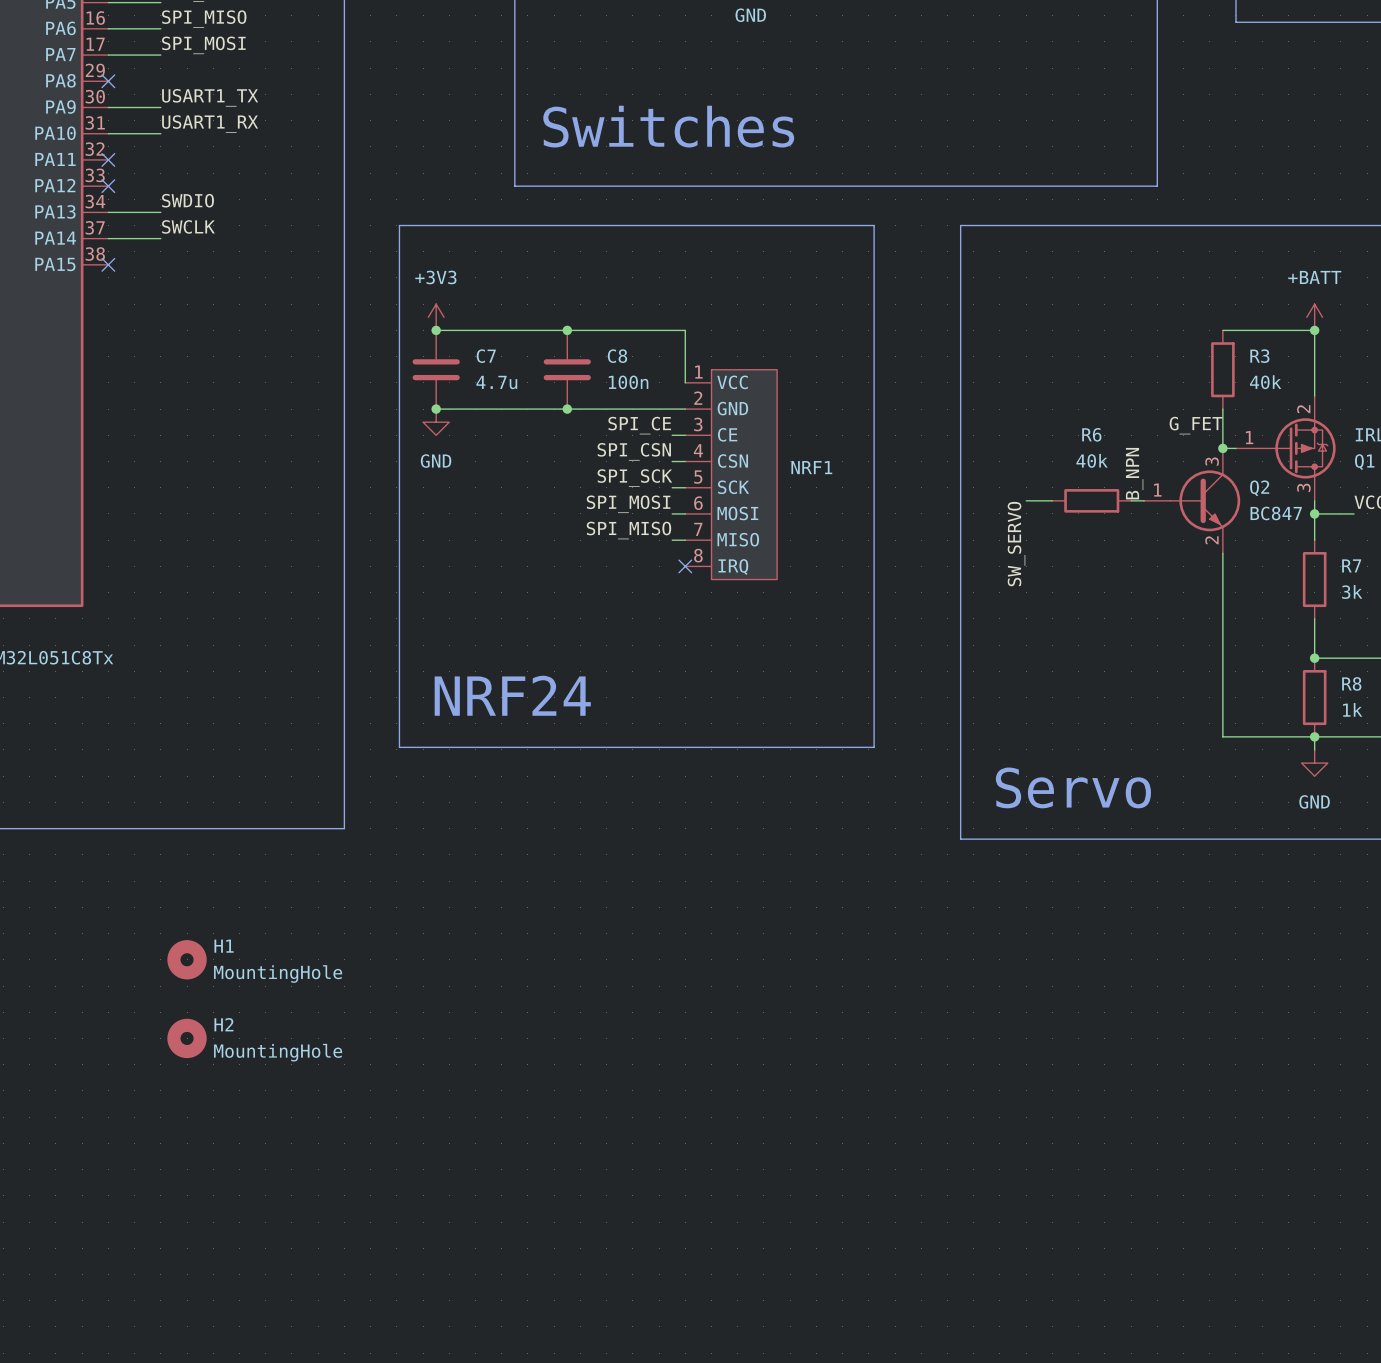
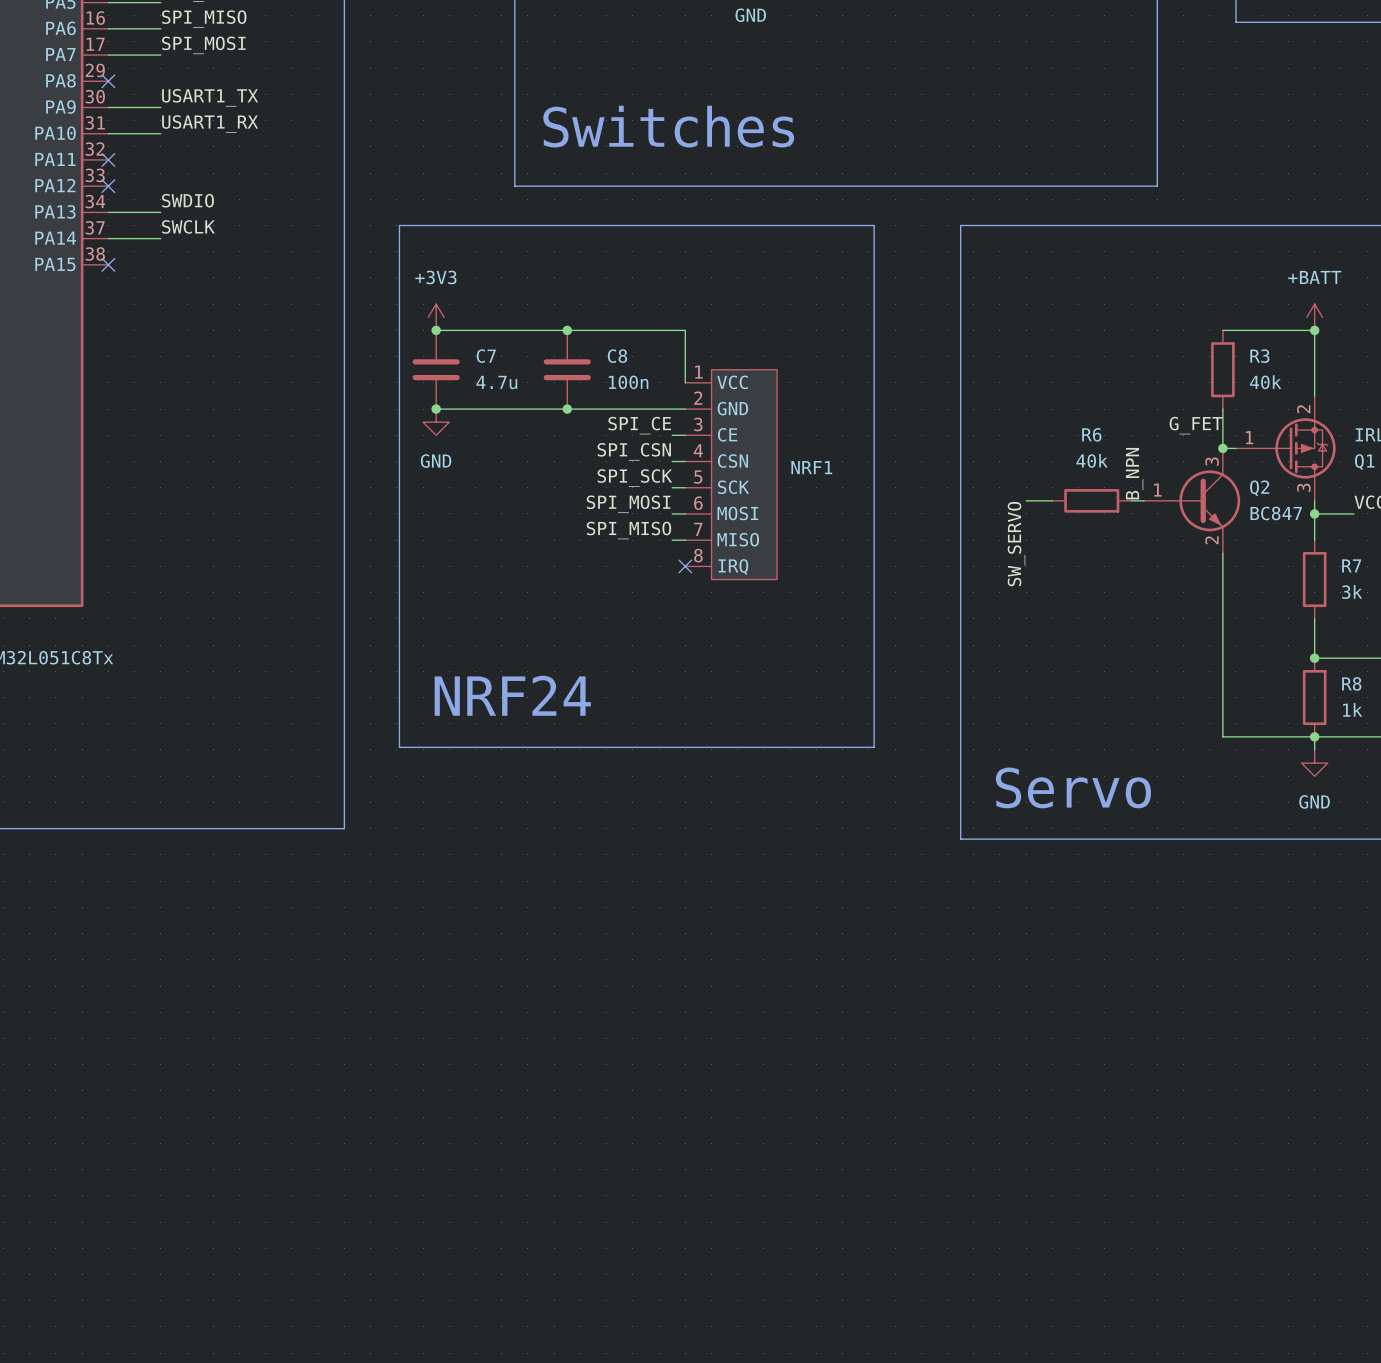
H1: MountingHole (187, 959) -> none
H2: MountingHole (187, 1038) -> none

